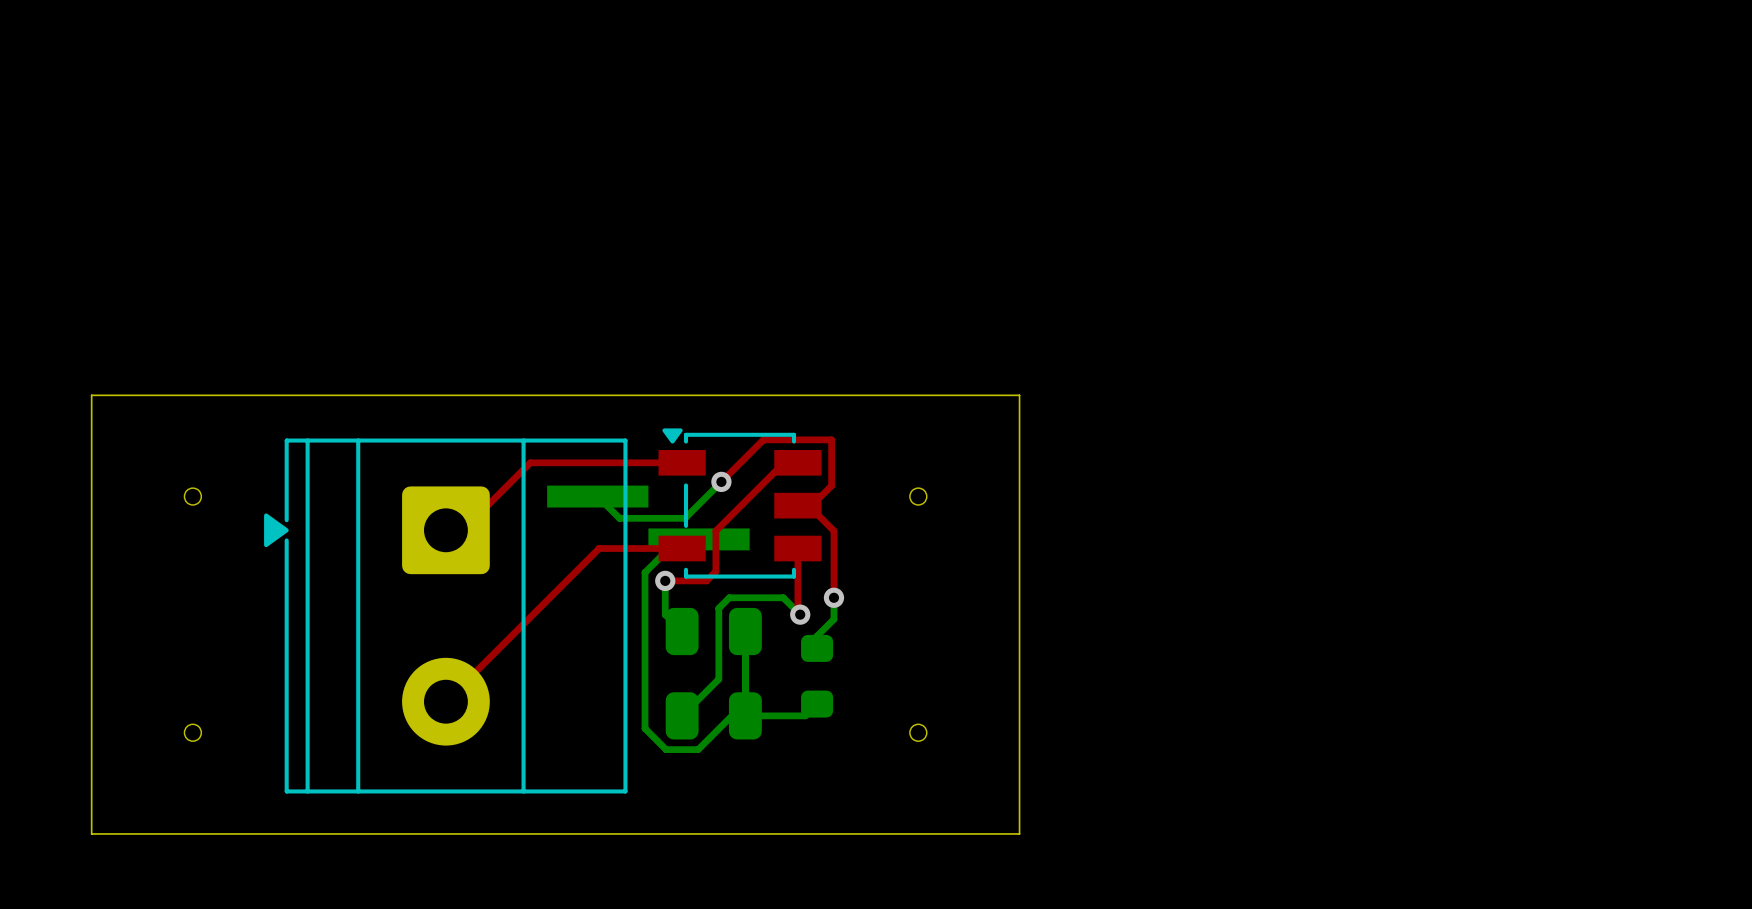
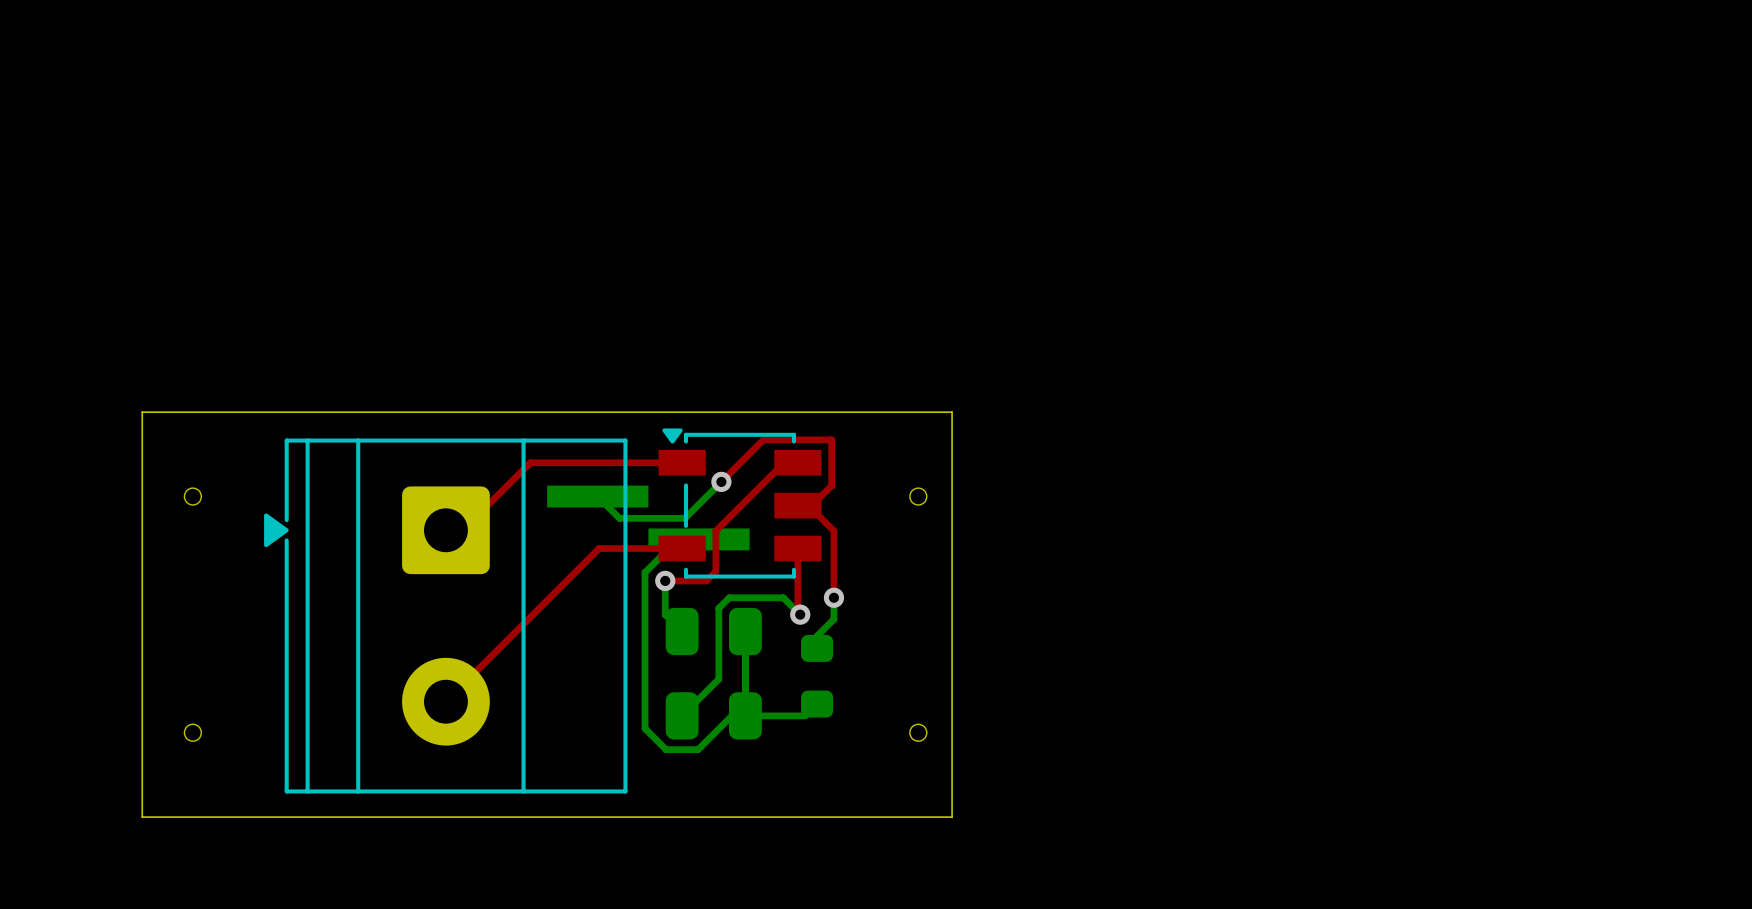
board edge: (91, 395) (1019, 395) (1019, 833) (91, 833) (91, 395) -> (142, 412) (142, 817) (952, 817) (952, 412) (142, 412)

